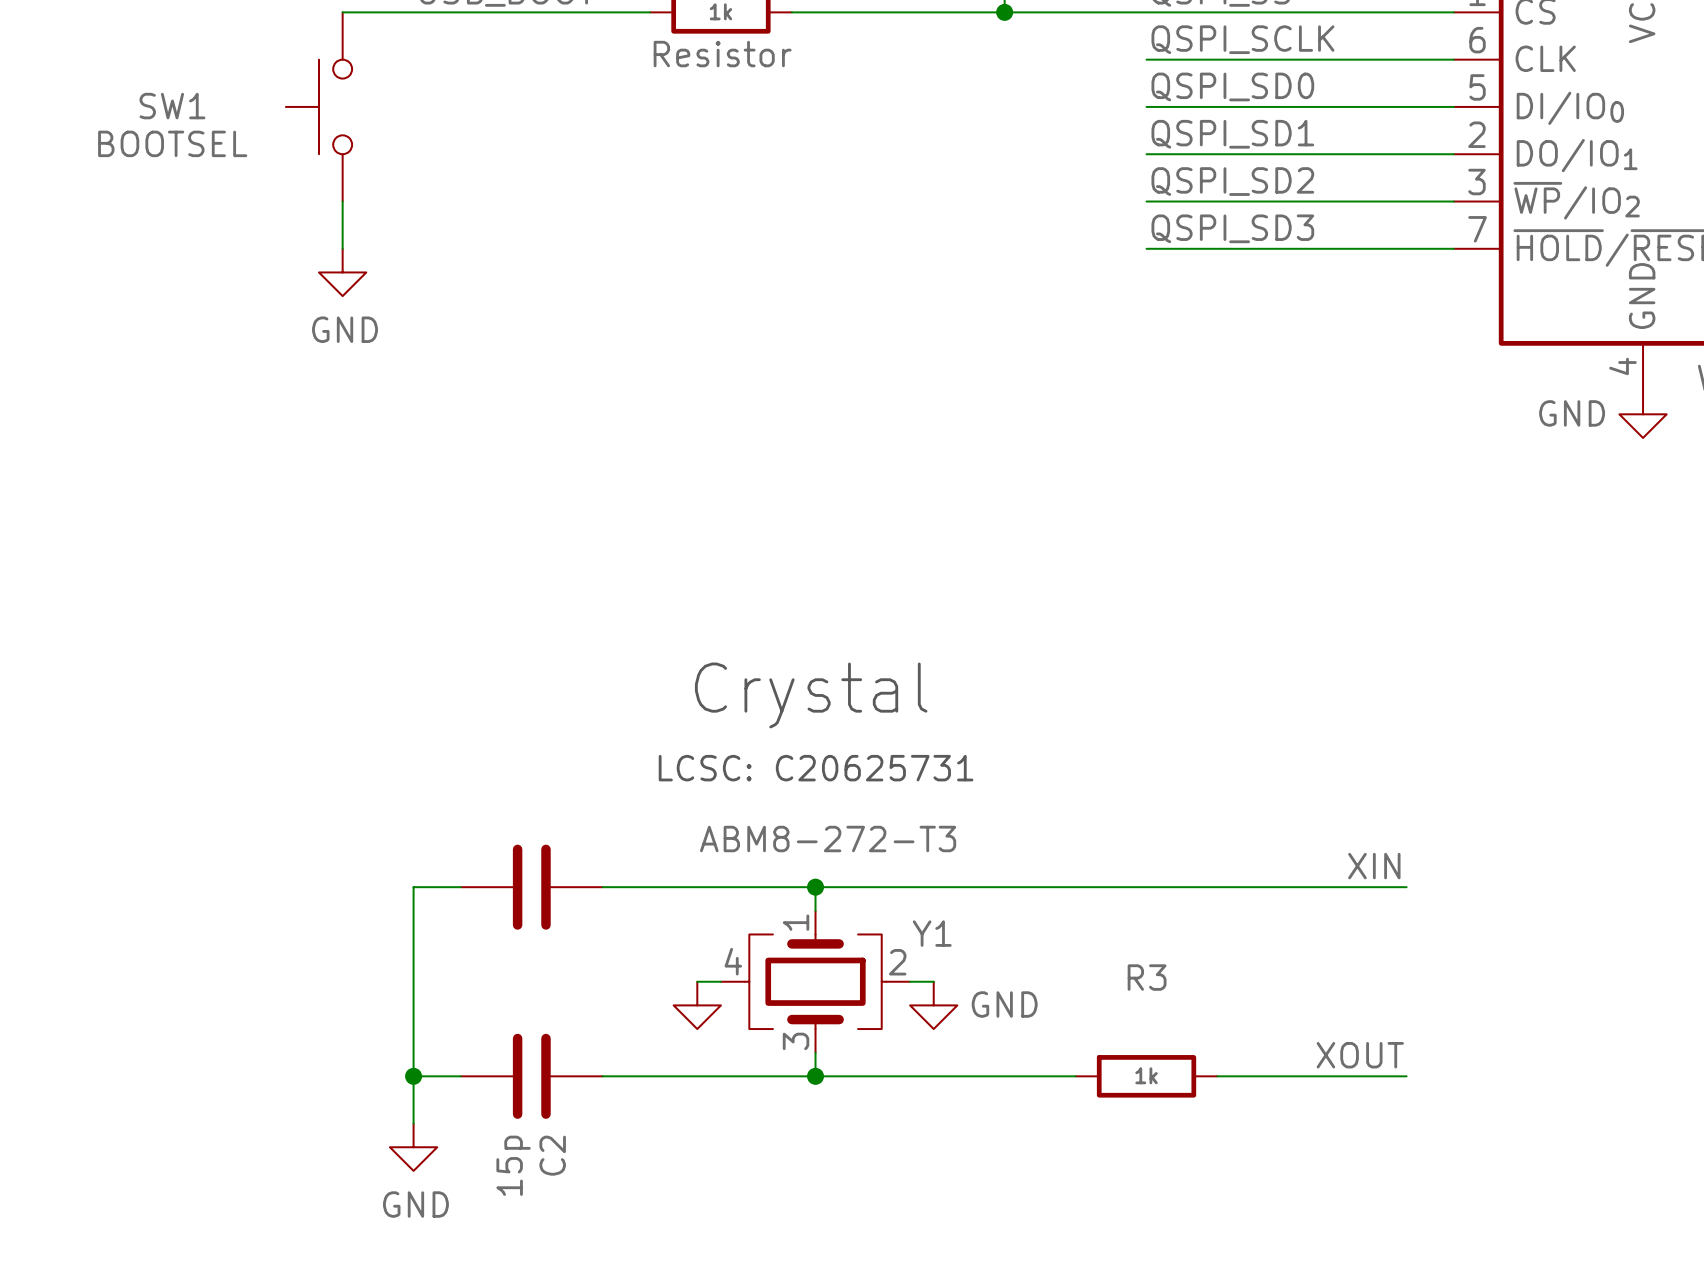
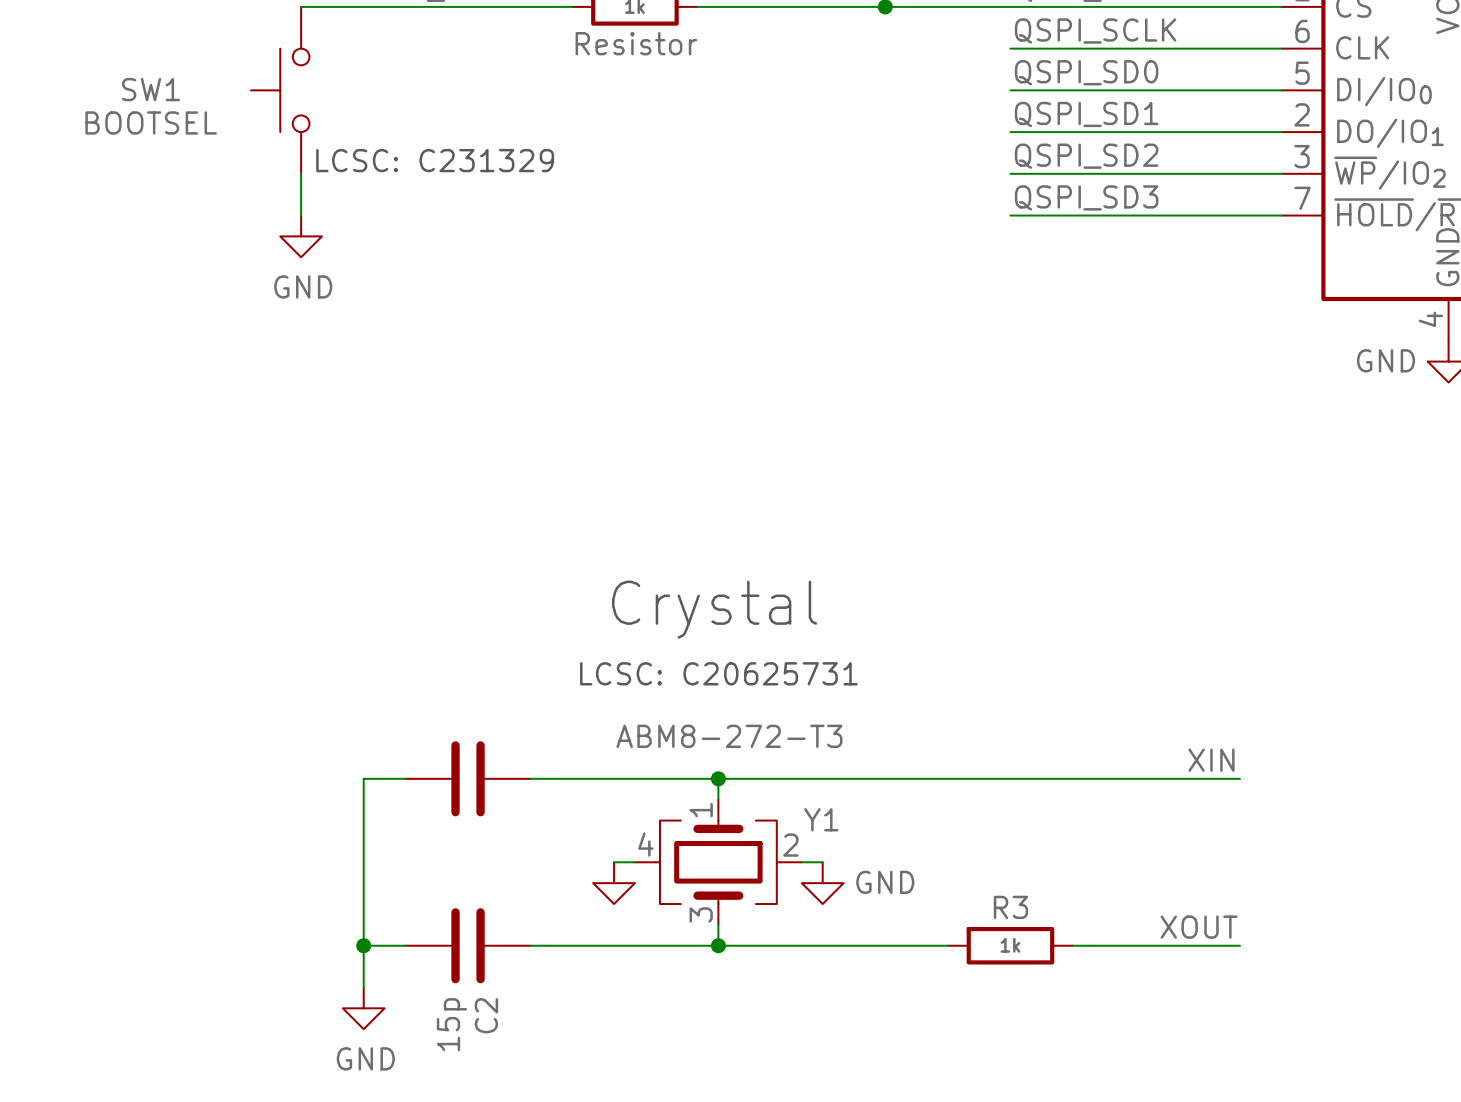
text: none -> LCSC: C231329 (435, 160)
R3 name position: R3 (1147, 977) -> R3 (1010, 907)

